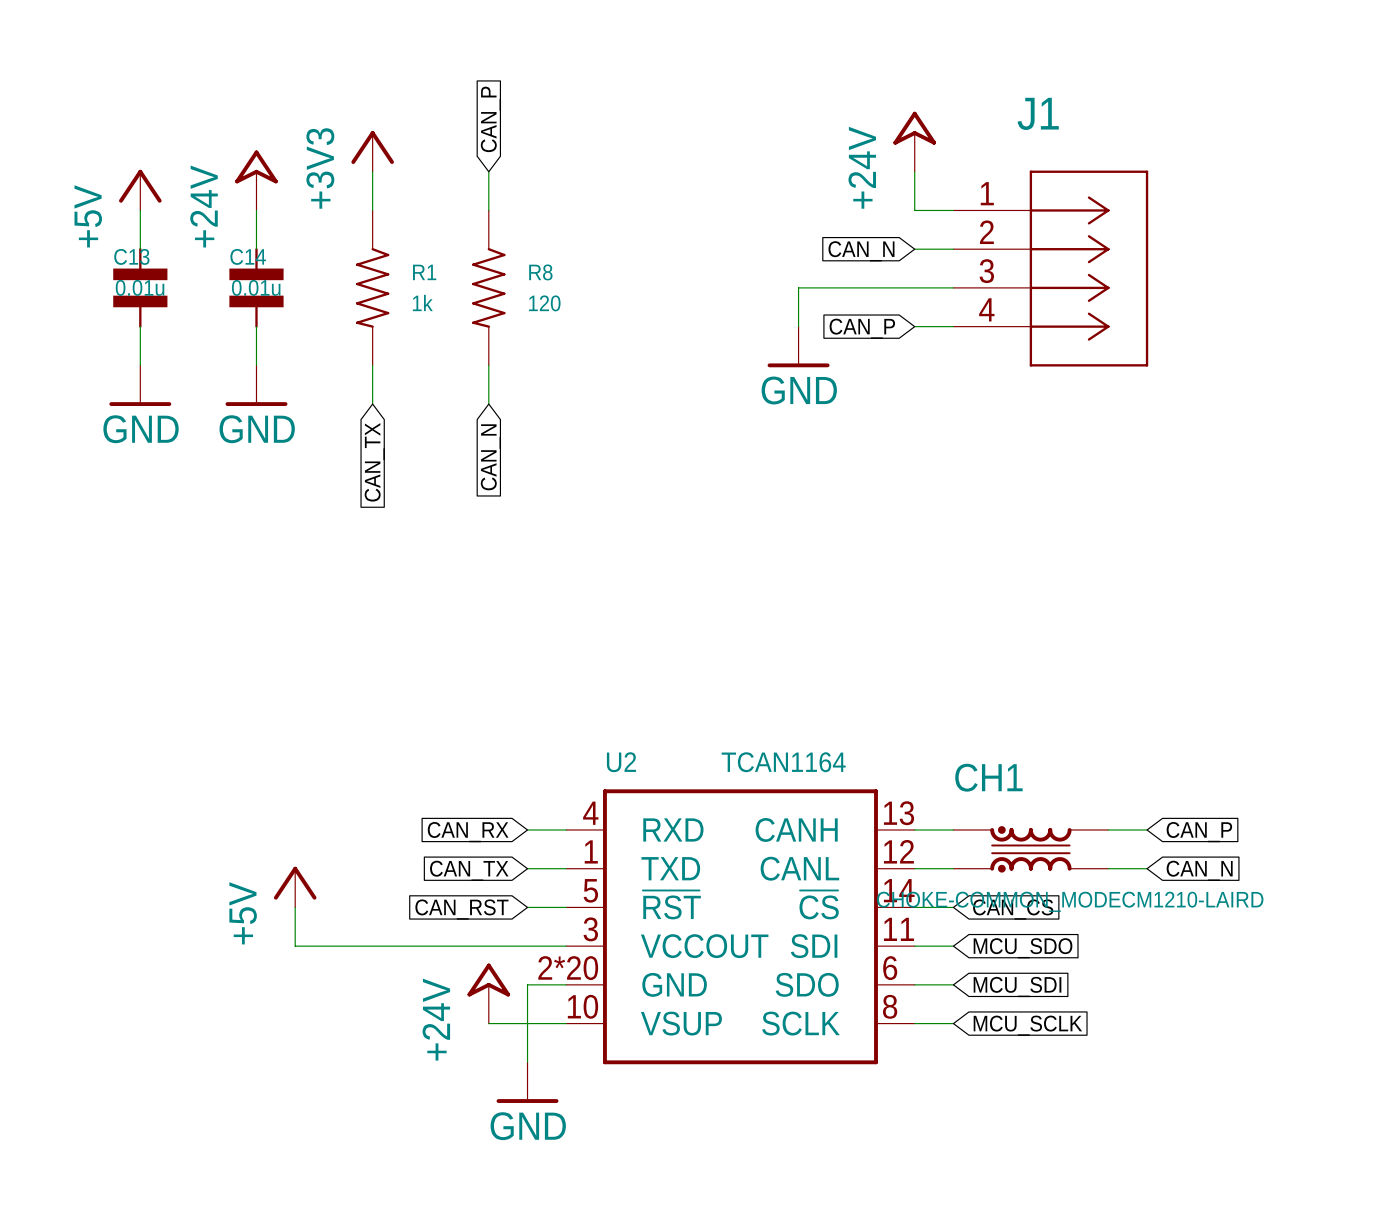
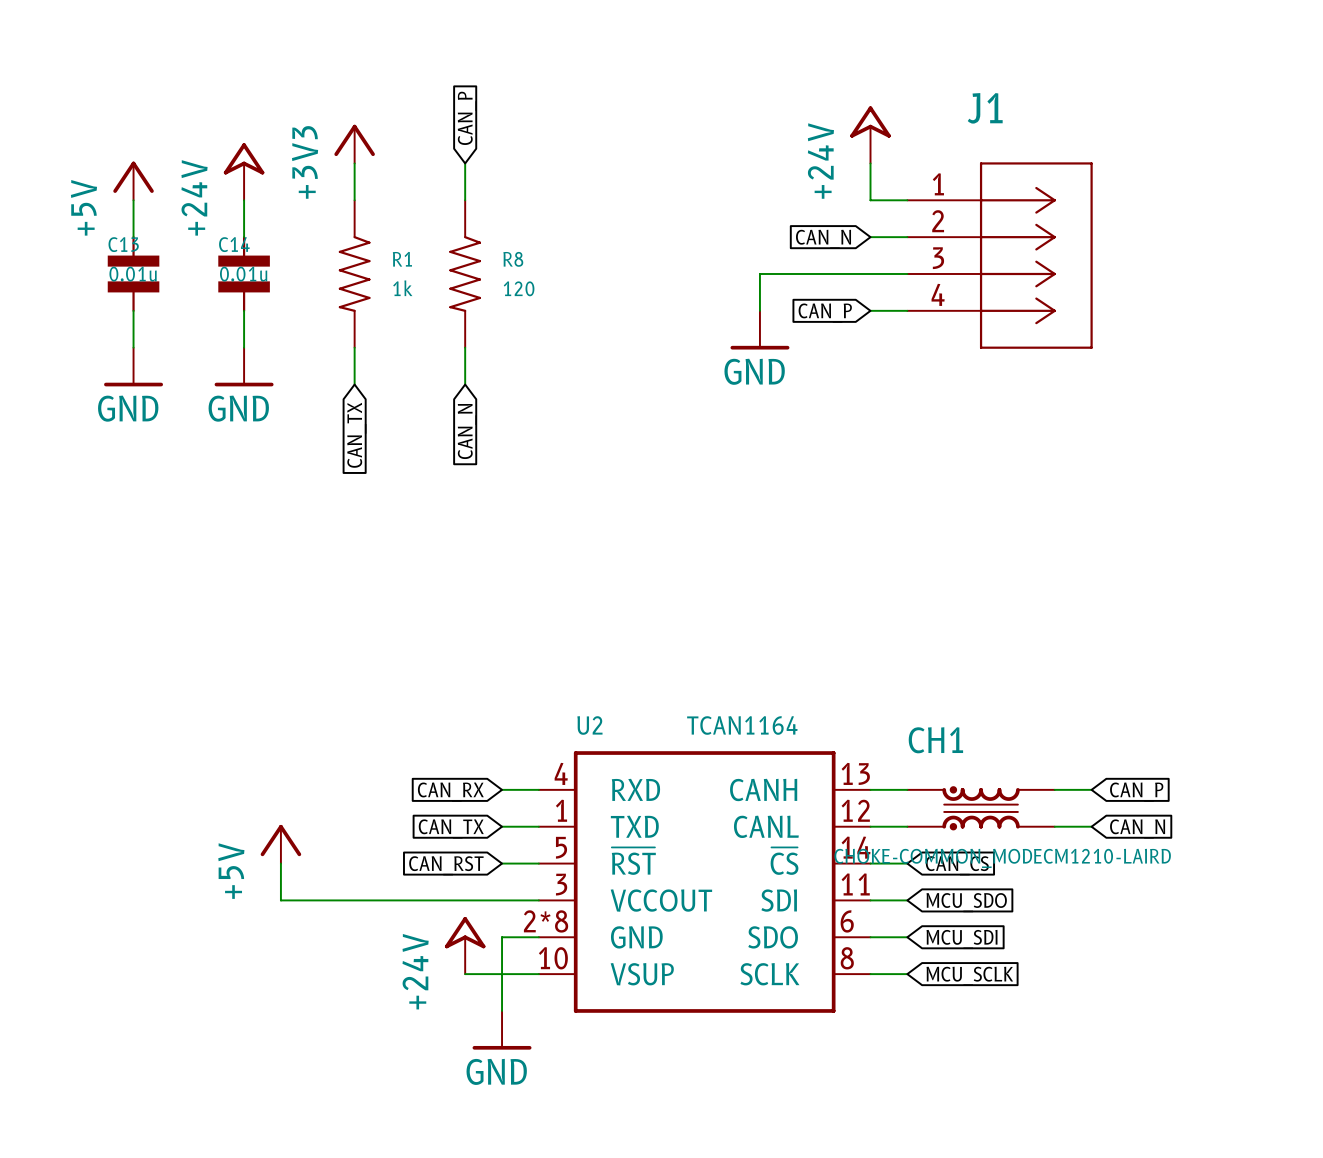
U2 pin number: 2*20 (568, 968) -> 2*8 (546, 921)

